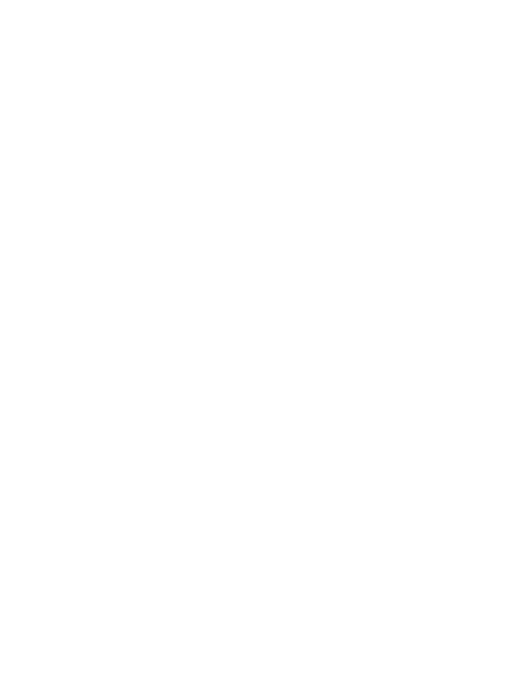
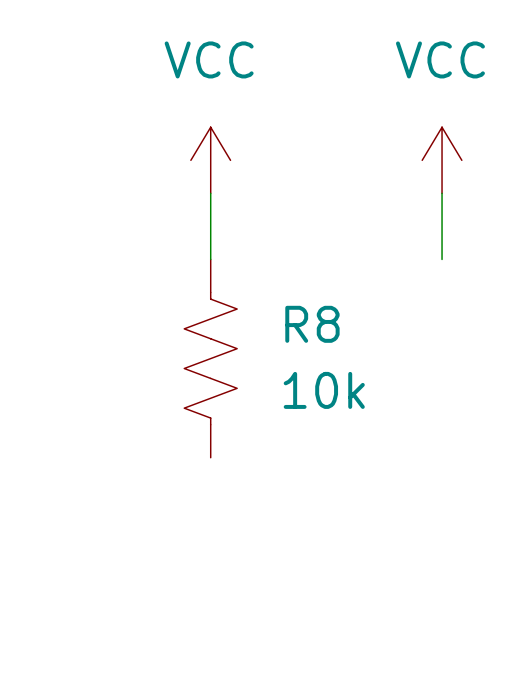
power symbol: none -> VCC (210, 160)
power symbol: none -> VCC (442, 160)
wire: none -> (210, 193) (210, 259)
wire: none -> (442, 193) (442, 259)
R8: none -> 10k (210, 358)

